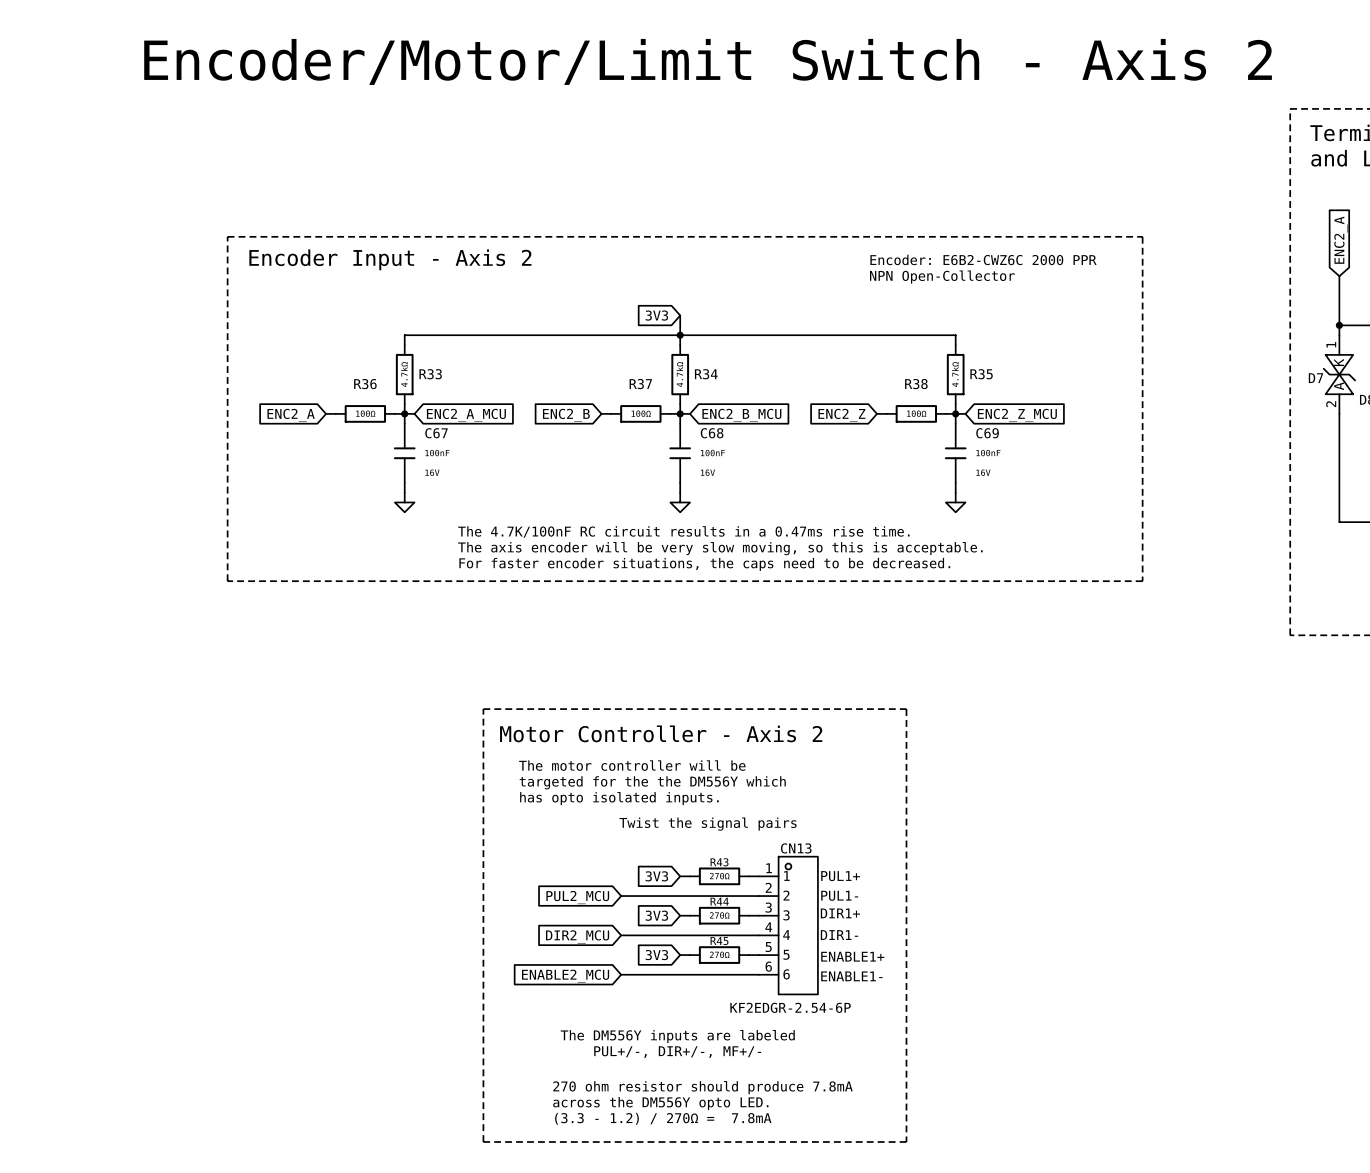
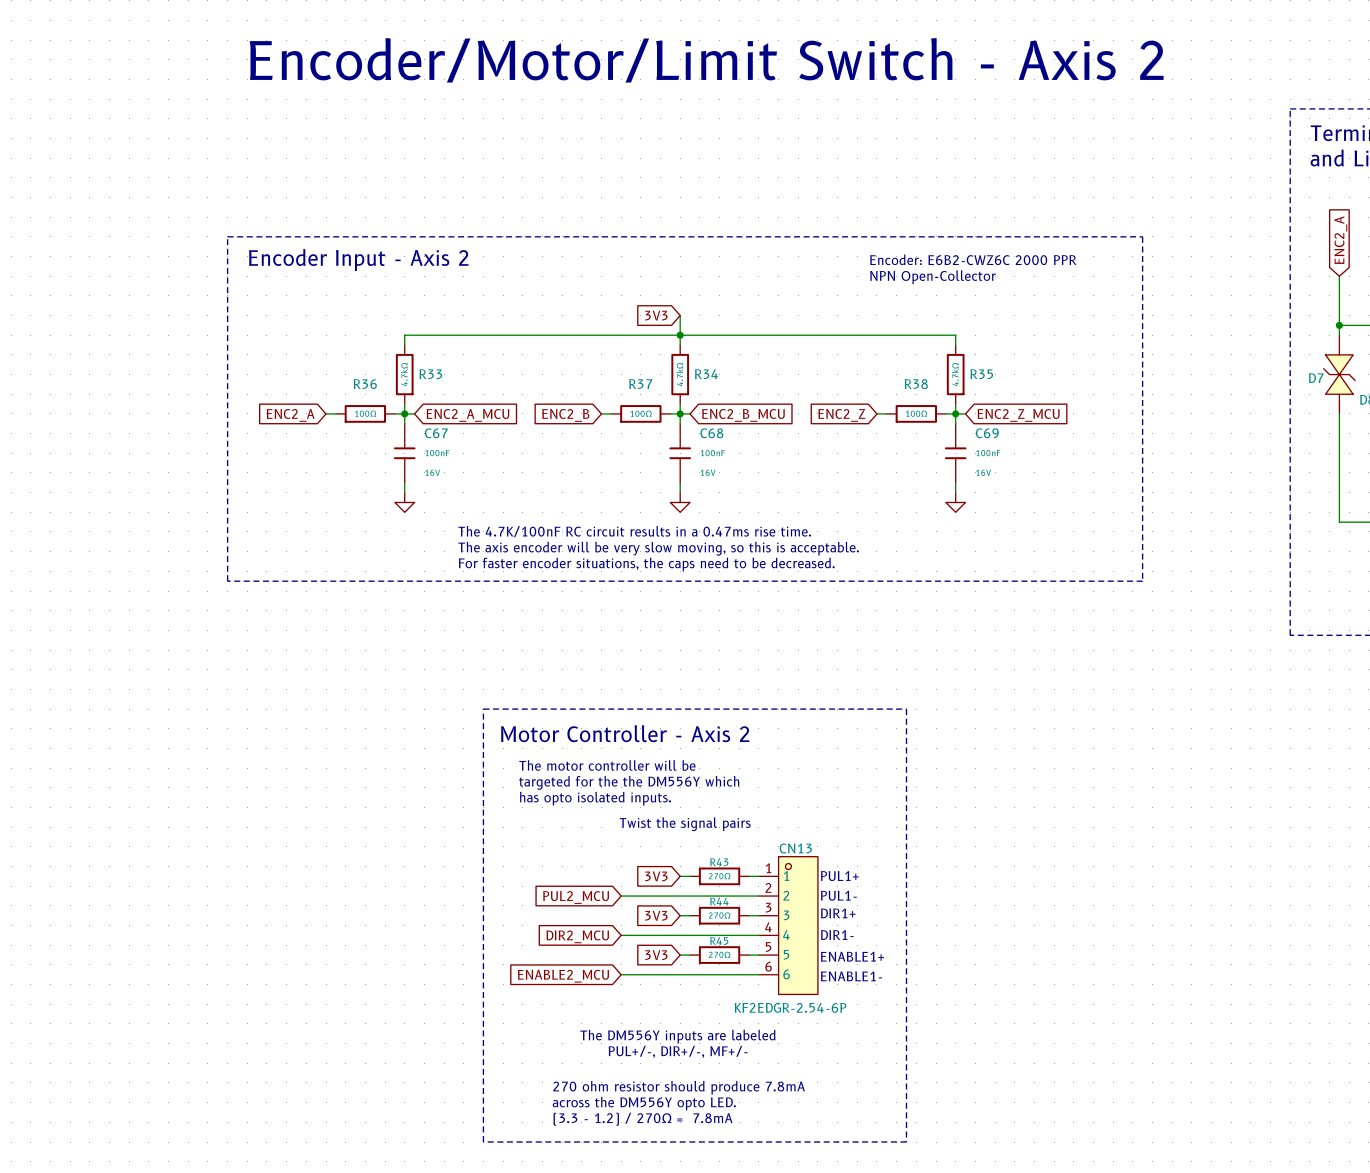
D7 pin number: 1 (1331, 344) -> none
D7 pin name: K (1339, 362) -> none
D7 pin name: A (1339, 386) -> none
D7 pin number: 2 (1331, 404) -> none

